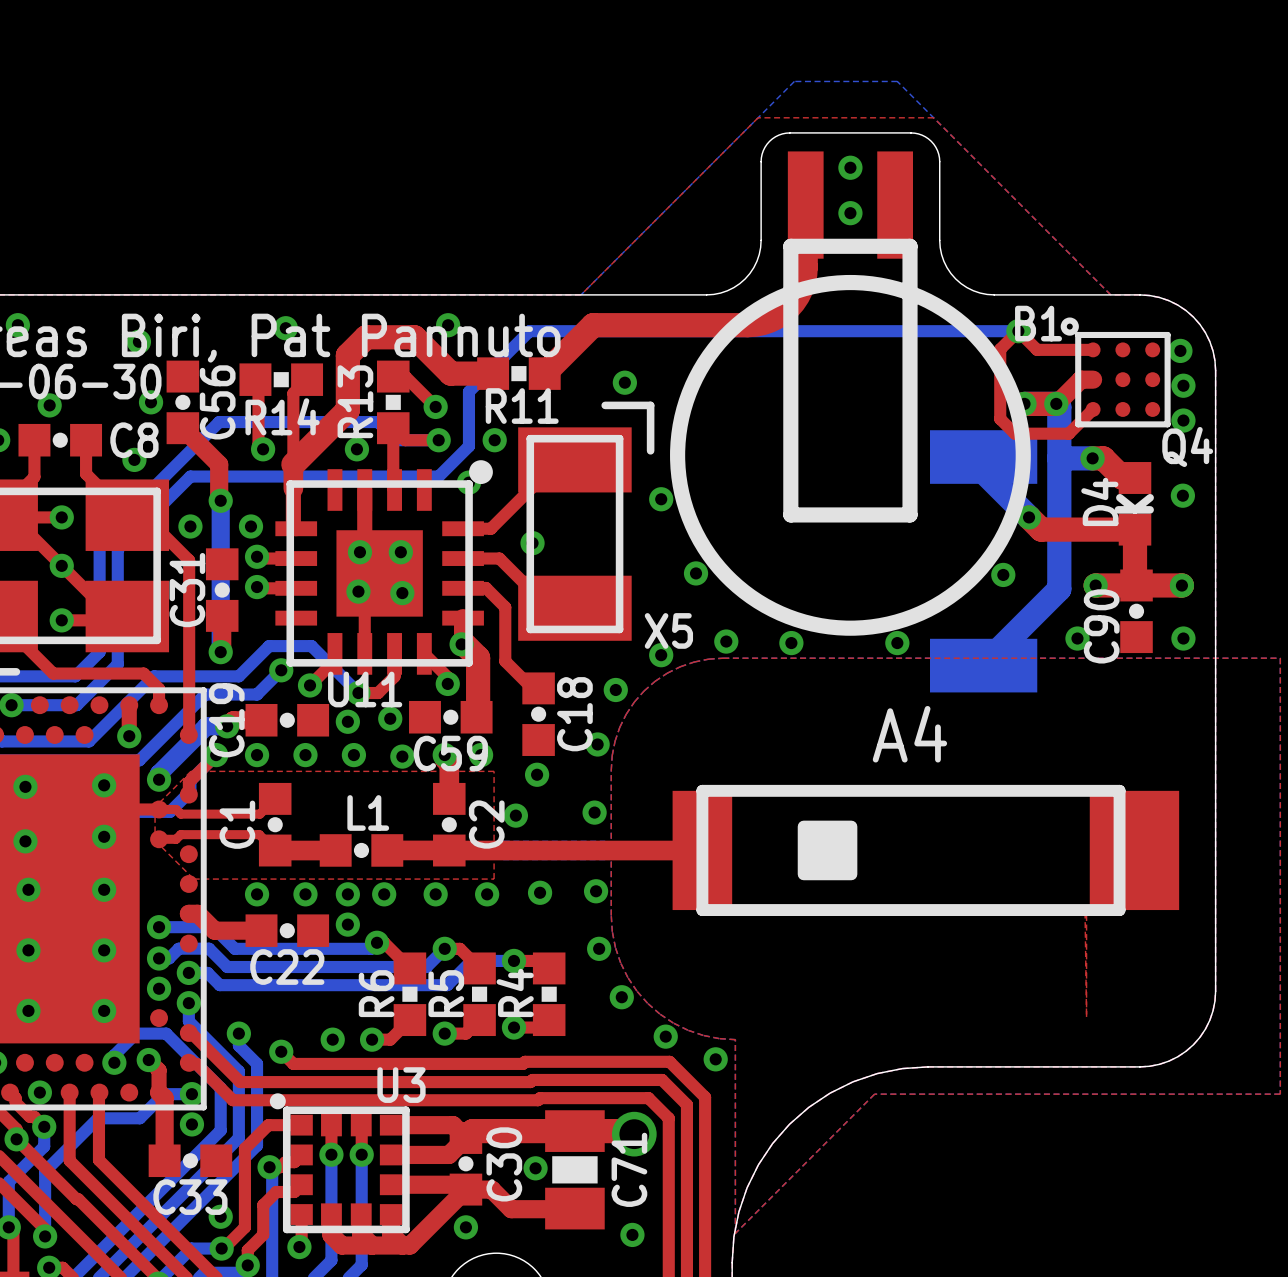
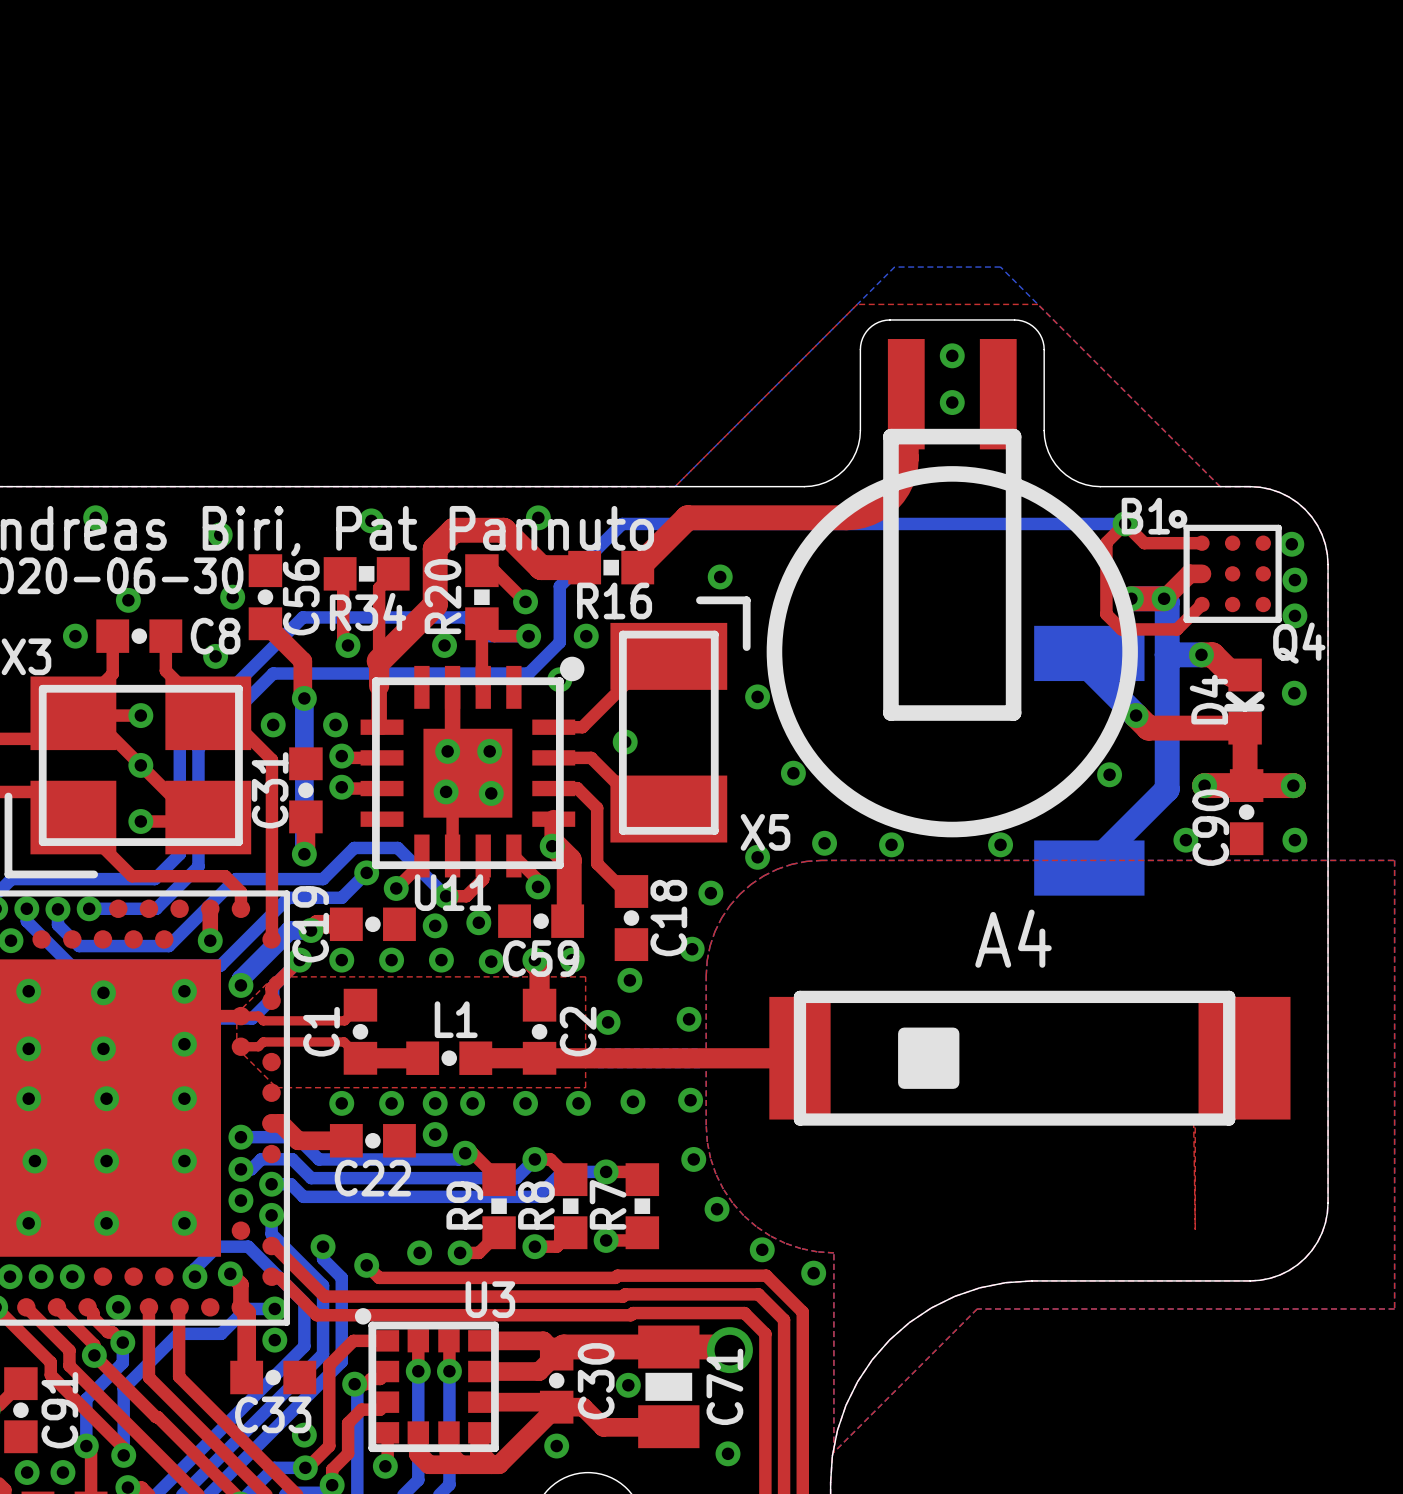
R13 name: R13 (355, 401) -> R20 (442, 596)
R11 name: R11 (522, 406) -> R16 (614, 600)
R14 name: R14 (282, 416) -> R34 (368, 612)
R4 name: R4 (515, 992) -> R7 (608, 1204)
R6 name: R6 (376, 993) -> R9 (464, 1205)
R5 name: R5 (446, 993) -> R8 (536, 1205)

